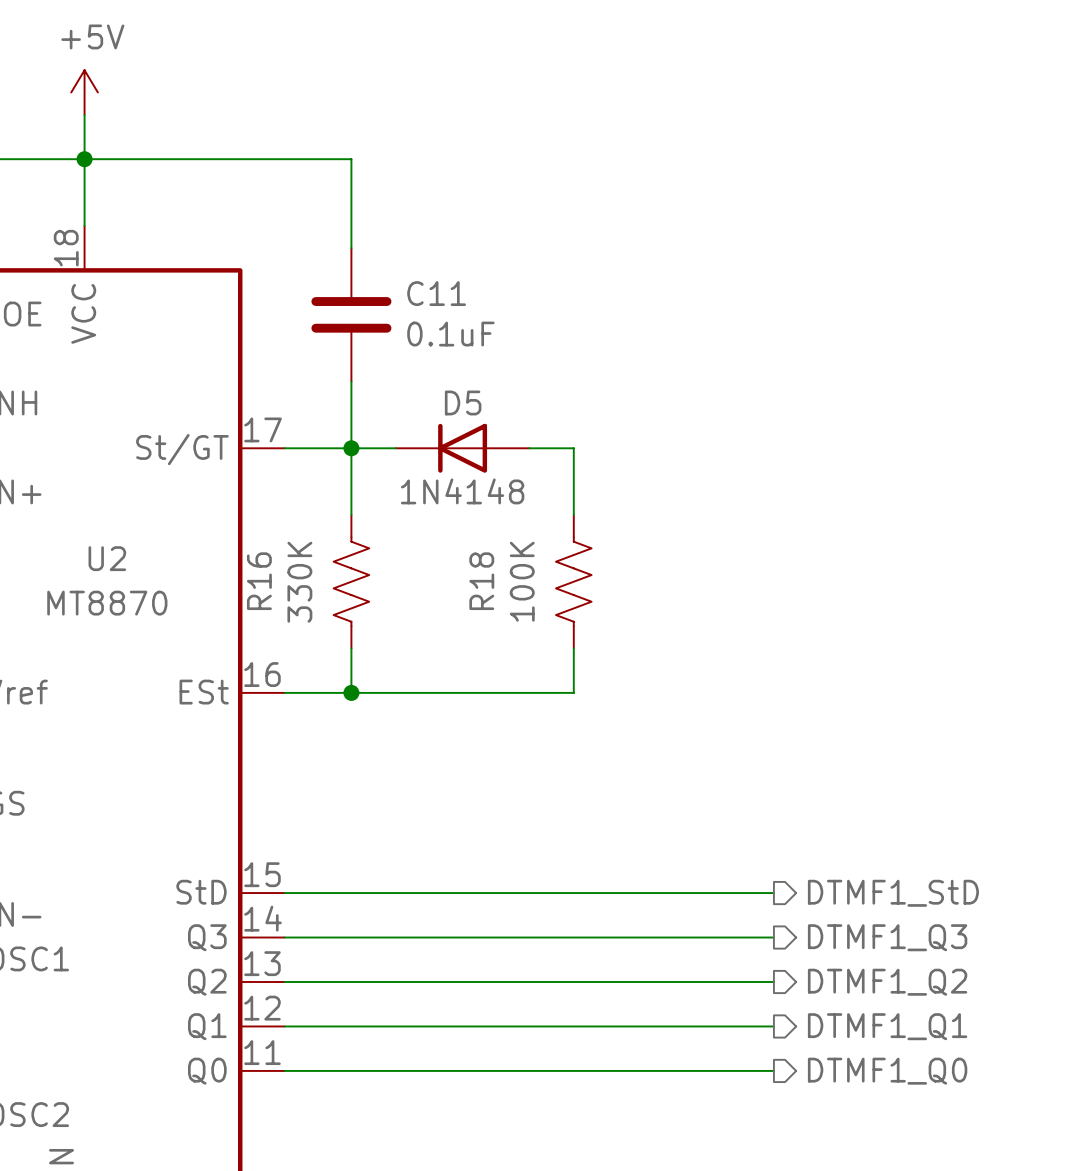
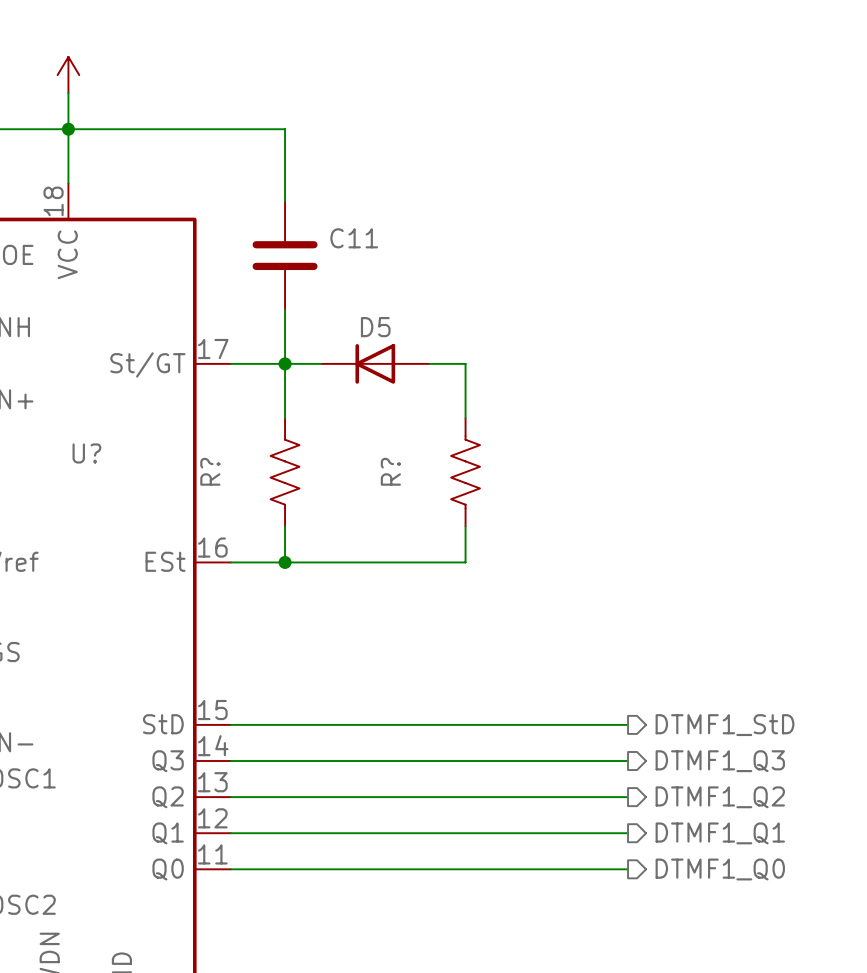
power symbol text: +5V (92, 36) -> none
C11 value: 0.1uF (450, 334) -> none
D5 value: 1N4148 (462, 491) -> none
U2 name: U2 (107, 558) -> U? (86, 453)
R16 name: R16 (259, 581) -> R? (210, 471)
R18 name: R18 (481, 581) -> R? (390, 471)
R18 value: 100K (522, 581) -> none
R16 value: 330K (299, 582) -> none
U2 value: MT8870 (107, 603) -> none

